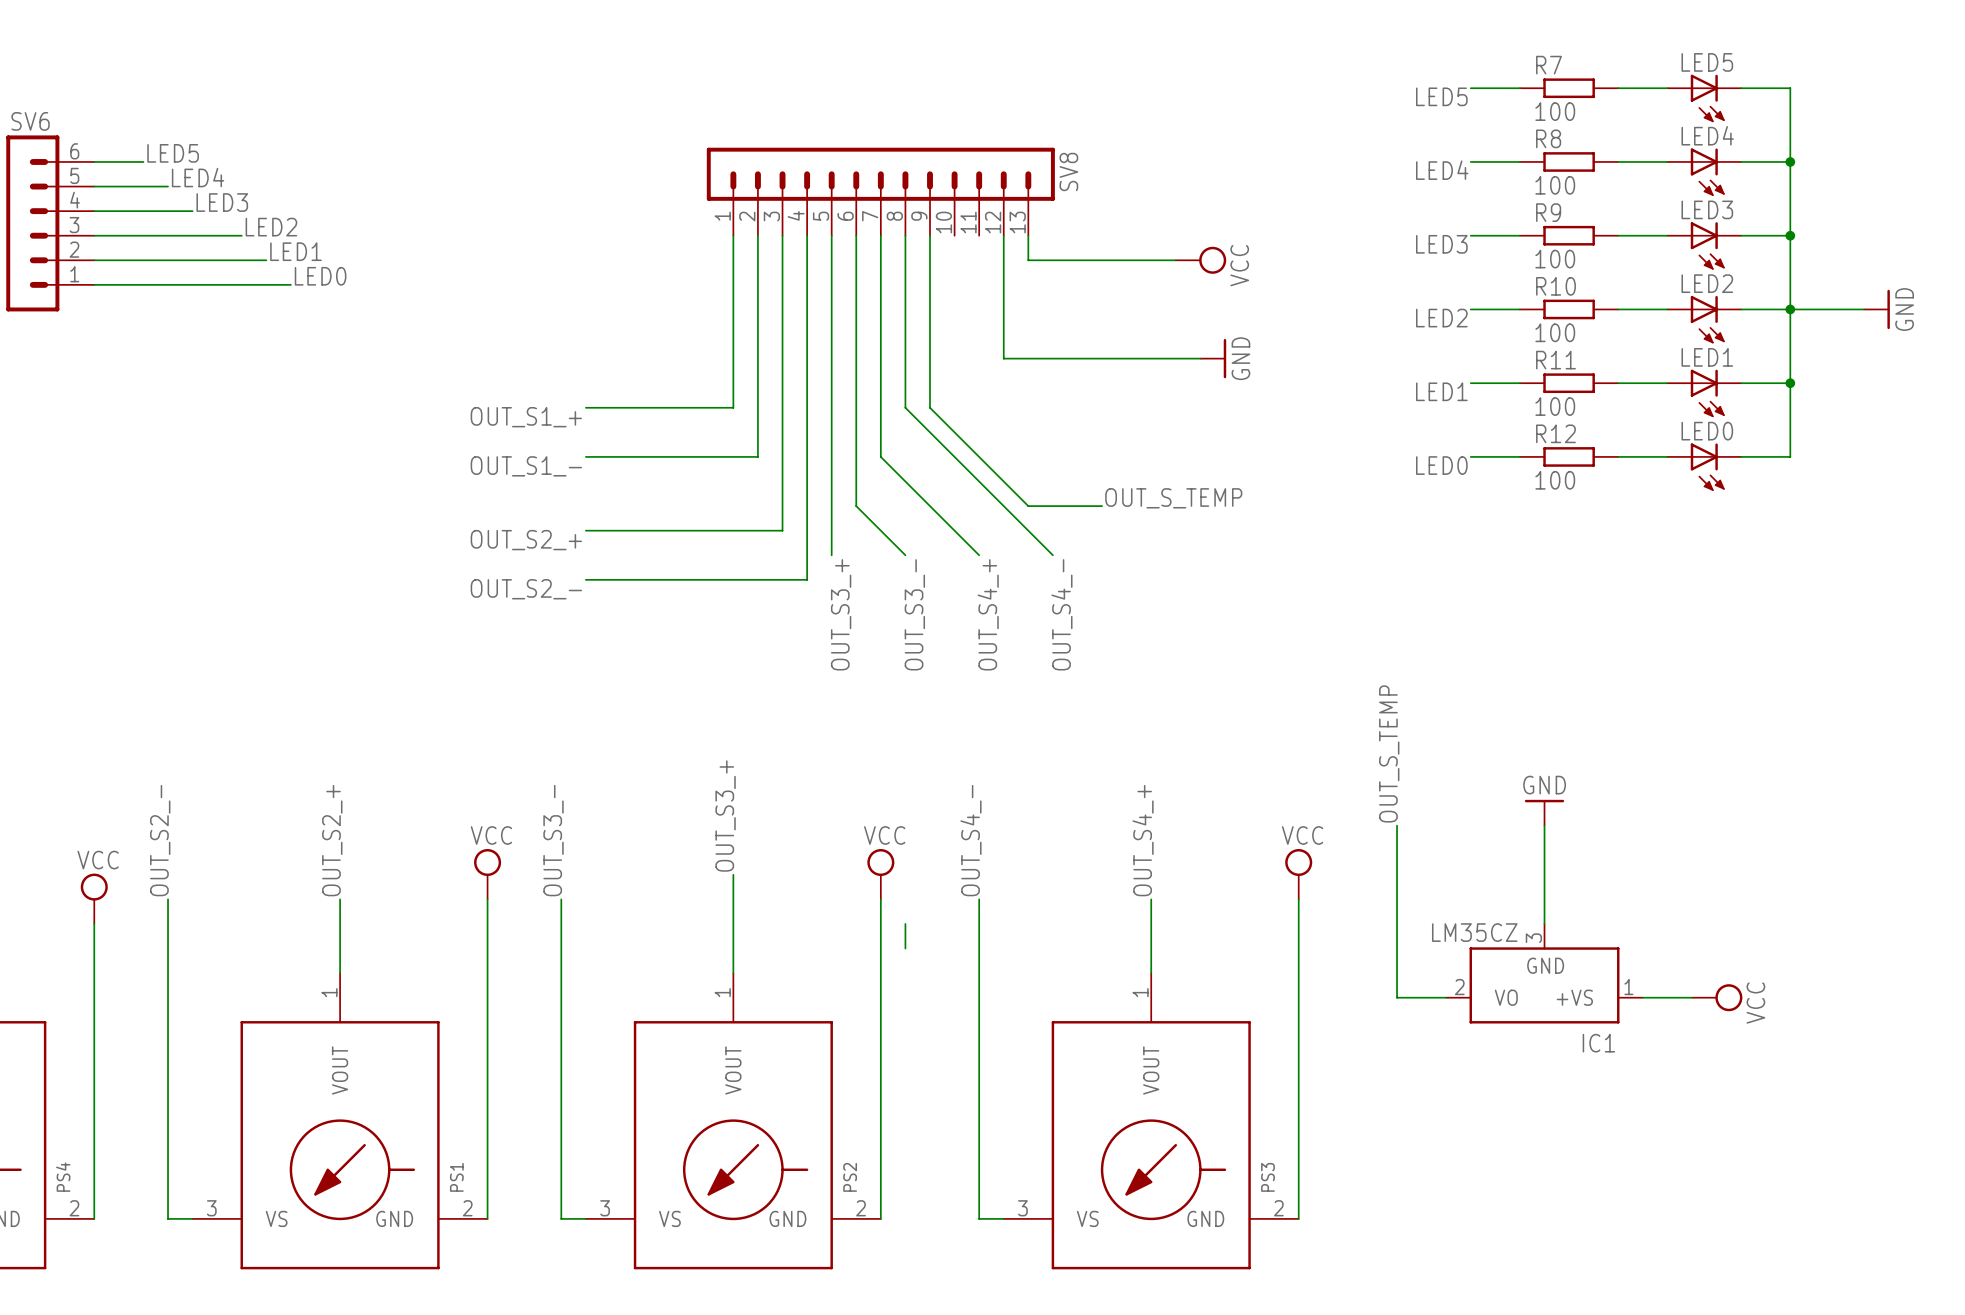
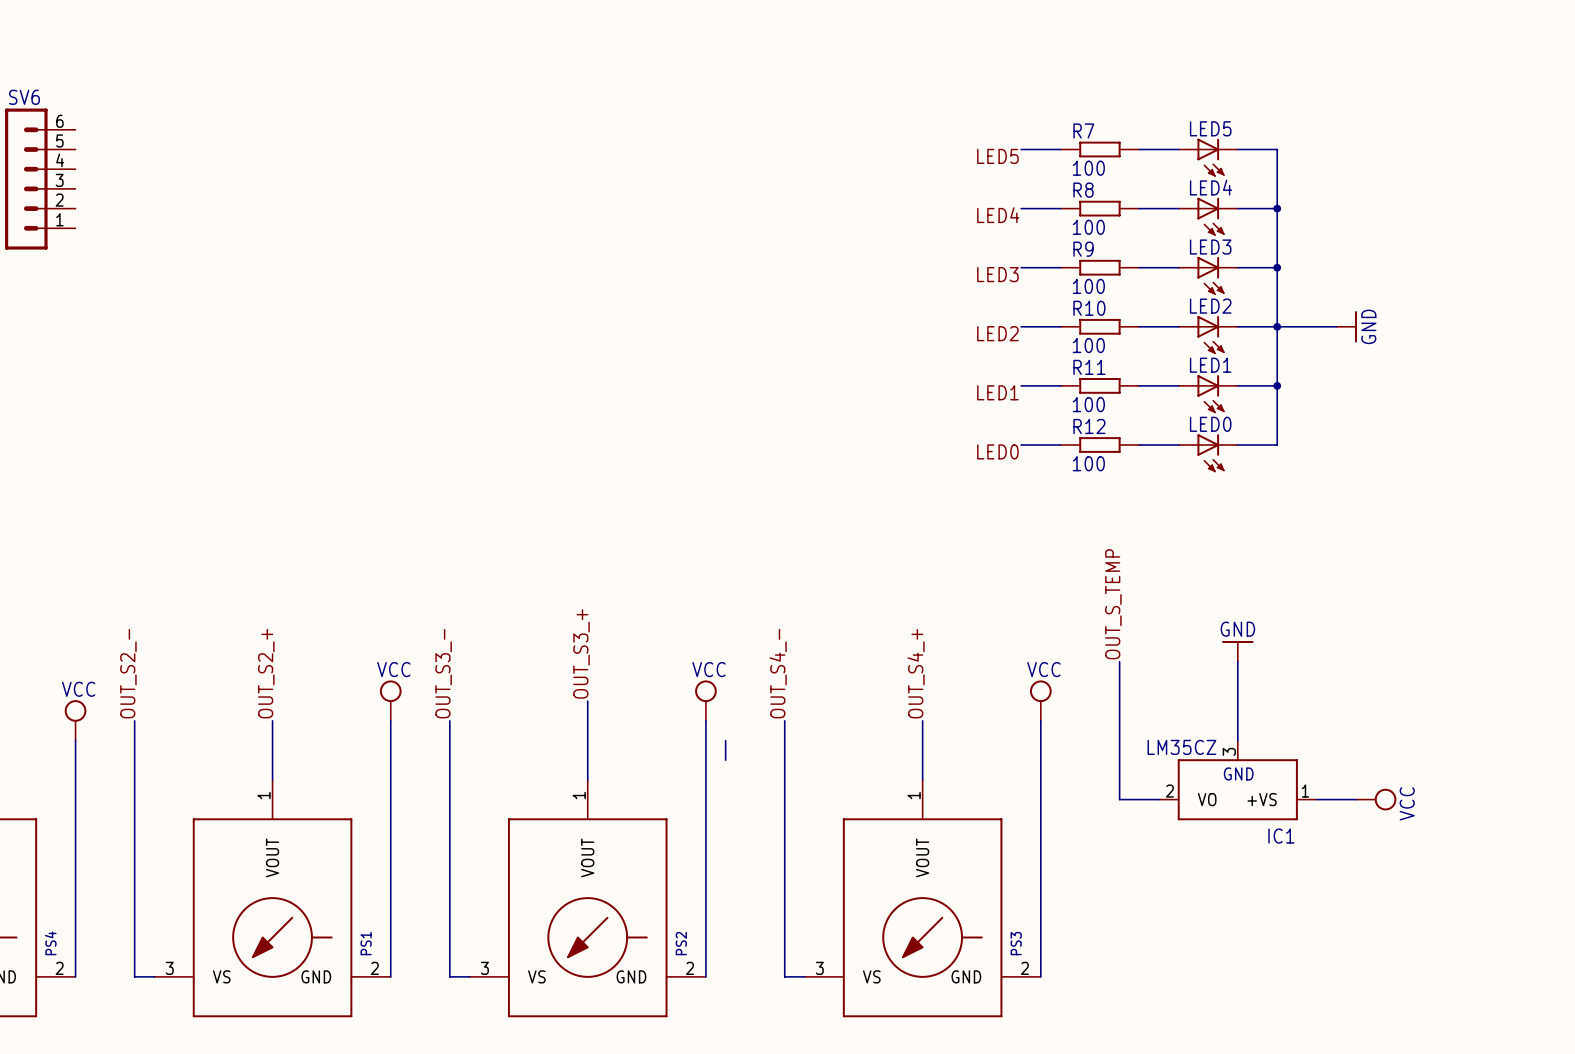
wire: (1470, 88) (1519, 88) -> (1021, 149) (1060, 149)
R7 position: (1569, 88) -> (1099, 149)
wire: (1618, 88) (1667, 88) -> (1139, 149) (1178, 149)
wire: (1741, 88) (1790, 88) (1790, 456) (1741, 456) -> (1237, 149) (1277, 149) (1277, 445) (1237, 445)
label position: LED5 (1441, 96) -> LED5 (997, 156)
LED5 position: (1704, 98) -> (1208, 157)
label: LED5 (173, 153) -> none
wire: (94, 161) (143, 161) -> none
wire: (1470, 161) (1519, 161) -> (1021, 208) (1060, 208)
R8 position: (1569, 161) -> (1099, 208)
wire: (1618, 161) (1667, 161) -> (1139, 208) (1178, 208)
wire: (1741, 161) (1790, 161) -> (1237, 208) (1277, 208)
junction: (1790, 161) -> none
label position: LED4 (1442, 170) -> LED4 (998, 215)
LED4 position: (1704, 172) -> (1208, 216)
label: LED4 (198, 177) -> none
wire: (94, 186) (168, 186) -> none
SV8: (880, 191) -> none
label: LED3 (222, 202) -> none
wire: (94, 211) (192, 211) -> none
label: LED2 (271, 227) -> none
wire: (94, 235) (241, 235) -> none
wire: (733, 235) (733, 407) (585, 407) -> none
wire: (757, 235) (757, 456) (585, 456) -> none
wire: (782, 235) (782, 530) (585, 530) -> none
wire: (807, 235) (807, 579) (585, 579) -> none
wire: (831, 235) (831, 555) -> none
wire: (856, 235) (856, 506) (905, 555) -> none
wire: (880, 235) (880, 456) (979, 555) -> none
wire: (905, 235) (905, 407) (1052, 555) -> none
wire: (930, 235) (930, 407) (1028, 506) (1102, 506) -> none
wire: (1003, 235) (1003, 358) (1200, 358) -> none
wire: (1028, 235) (1028, 260) (1175, 260) -> none
wire: (1470, 235) (1519, 235) -> (1021, 267) (1060, 267)
R9 position: (1569, 235) -> (1099, 267)
wire: (1618, 235) (1667, 235) -> (1139, 267) (1178, 267)
wire: (1741, 235) (1790, 235) -> (1237, 267) (1277, 267)
junction: (1790, 235) -> none
label position: LED3 (1441, 244) -> LED3 (997, 274)
LED3 position: (1704, 245) -> (1208, 275)
label: LED1 (296, 251) -> none
wire: (94, 260) (266, 260) -> none
power symbol: VCC (1201, 260) -> none
junction: none -> (1277, 208)
label: LED0 (320, 276) -> none
wire: (94, 284) (290, 284) -> none
wire: (1470, 309) (1519, 309) -> (1021, 326) (1060, 326)
R10 position: (1569, 309) -> (1099, 326)
wire: (1618, 309) (1667, 309) -> (1139, 326) (1178, 326)
wire: (1741, 309) (1864, 309) -> (1237, 326) (1336, 326)
junction: (1790, 309) -> none
power symbol position: GND (1876, 309) -> GND (1346, 326)
label position: LED2 (1441, 318) -> LED2 (997, 333)
LED2 position: (1704, 319) -> (1208, 334)
junction: none -> (1277, 267)
power symbol: GND (1213, 358) -> none
wire: (1470, 383) (1519, 383) -> (1021, 385) (1060, 385)
R11 position: (1569, 383) -> (1099, 385)
wire: (1618, 383) (1667, 383) -> (1139, 385) (1178, 385)
wire: (1741, 383) (1790, 383) -> (1237, 385) (1277, 385)
junction: (1790, 383) -> none
label position: LED1 (1441, 391) -> LED1 (997, 392)
LED1 position: (1704, 393) -> (1208, 394)
junction: none -> (1277, 326)
label: OUT_S1_+ (526, 417) -> none
wire: (1470, 456) (1519, 456) -> (1021, 445) (1060, 445)
R12 position: (1569, 456) -> (1099, 445)
wire: (1618, 456) (1667, 456) -> (1139, 445) (1178, 445)
label position: LED0 (1441, 465) -> LED0 (997, 451)
label: OUT_S1_- (526, 466) -> none
LED0 position: (1704, 467) -> (1208, 453)
junction: none -> (1277, 385)
label: OUT_S_TEMP (1173, 498) -> none
label: OUT_S2_+ (526, 540) -> none
label: OUT_S2_- (526, 589) -> none
label: OUT_S3_+ (841, 614) -> none
label: OUT_S3_- (914, 614) -> none
label: OUT_S4_+ (988, 614) -> none
label: OUT_S4_- (1061, 614) -> none

